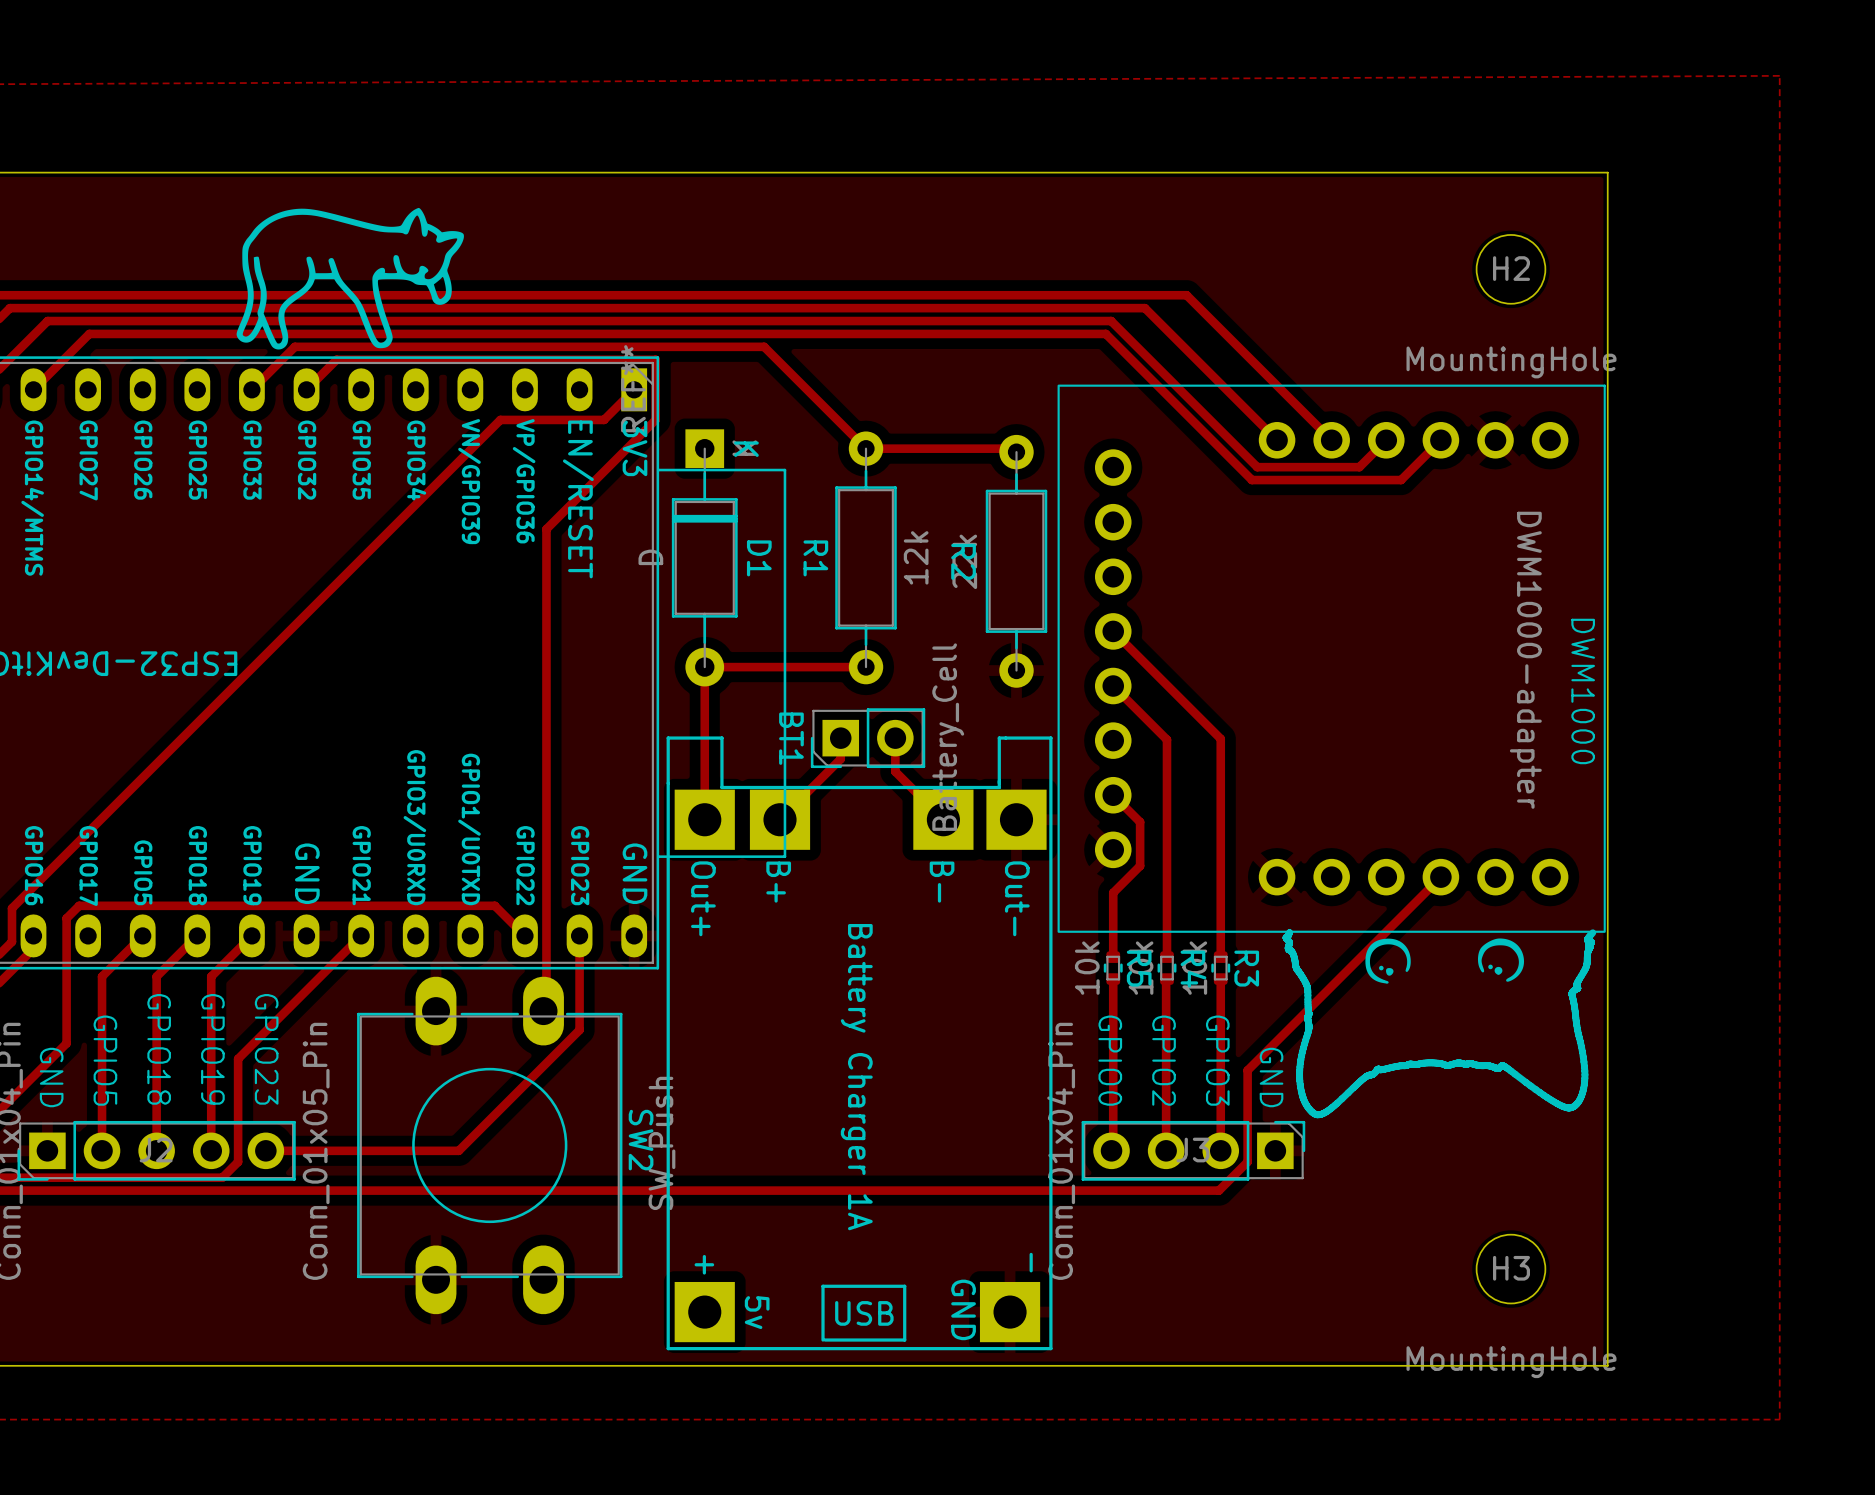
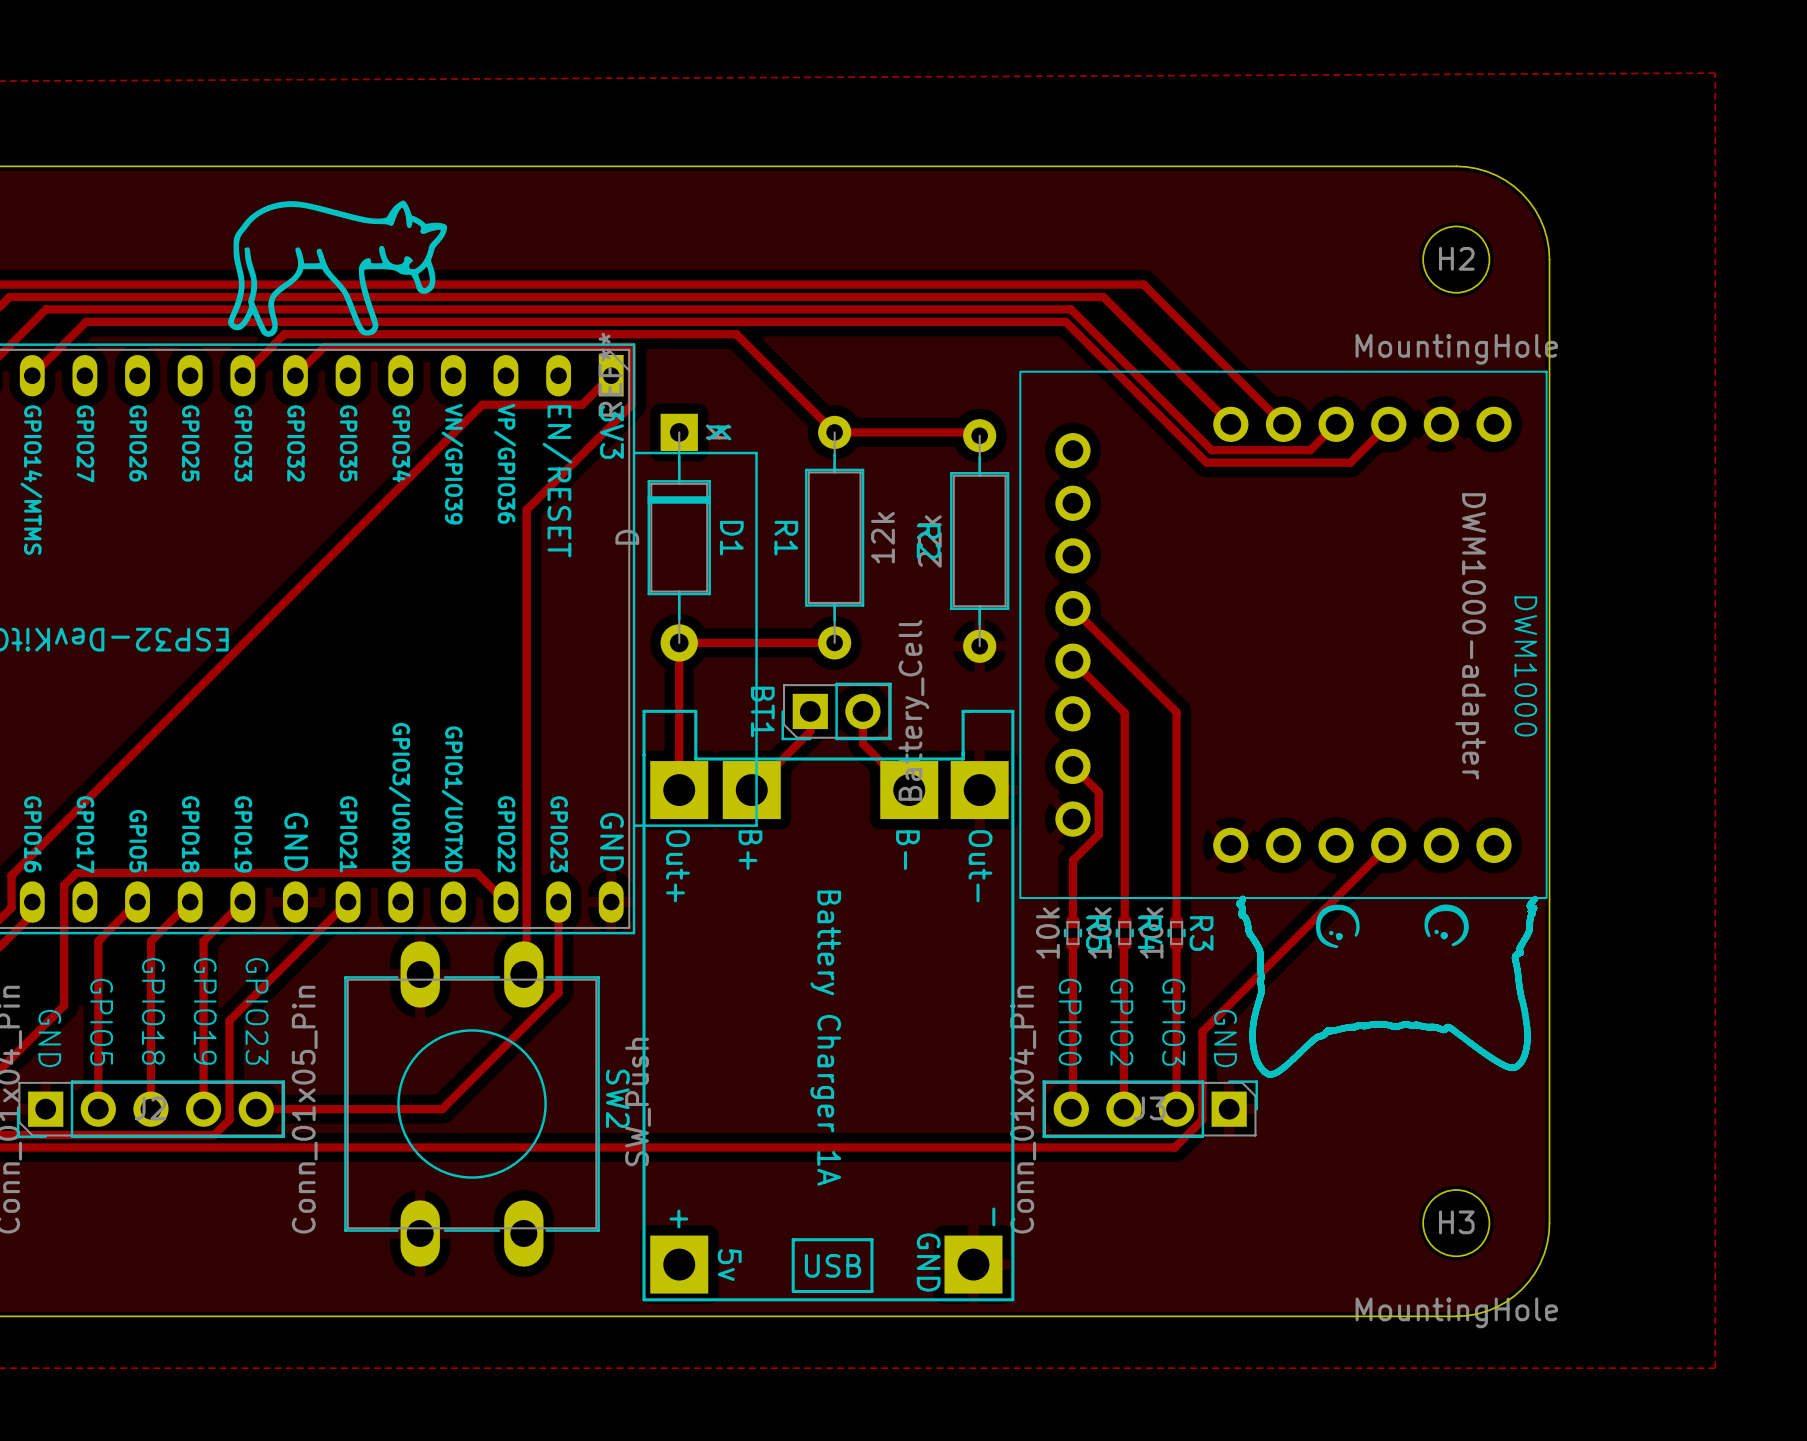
board edge: (1510, 172) (1607, 172) (1607, 269) -> (1456, 166) (1487, 171) (1505, 180) (1522, 193) (1535, 210) (1544, 228) (1549, 259)
board edge: (1607, 1269) (1607, 1365) (1510, 1365) -> (1549, 1223) (1547, 1243) (1540, 1263) (1522, 1289) (1496, 1307) (1477, 1314) (1456, 1316)

